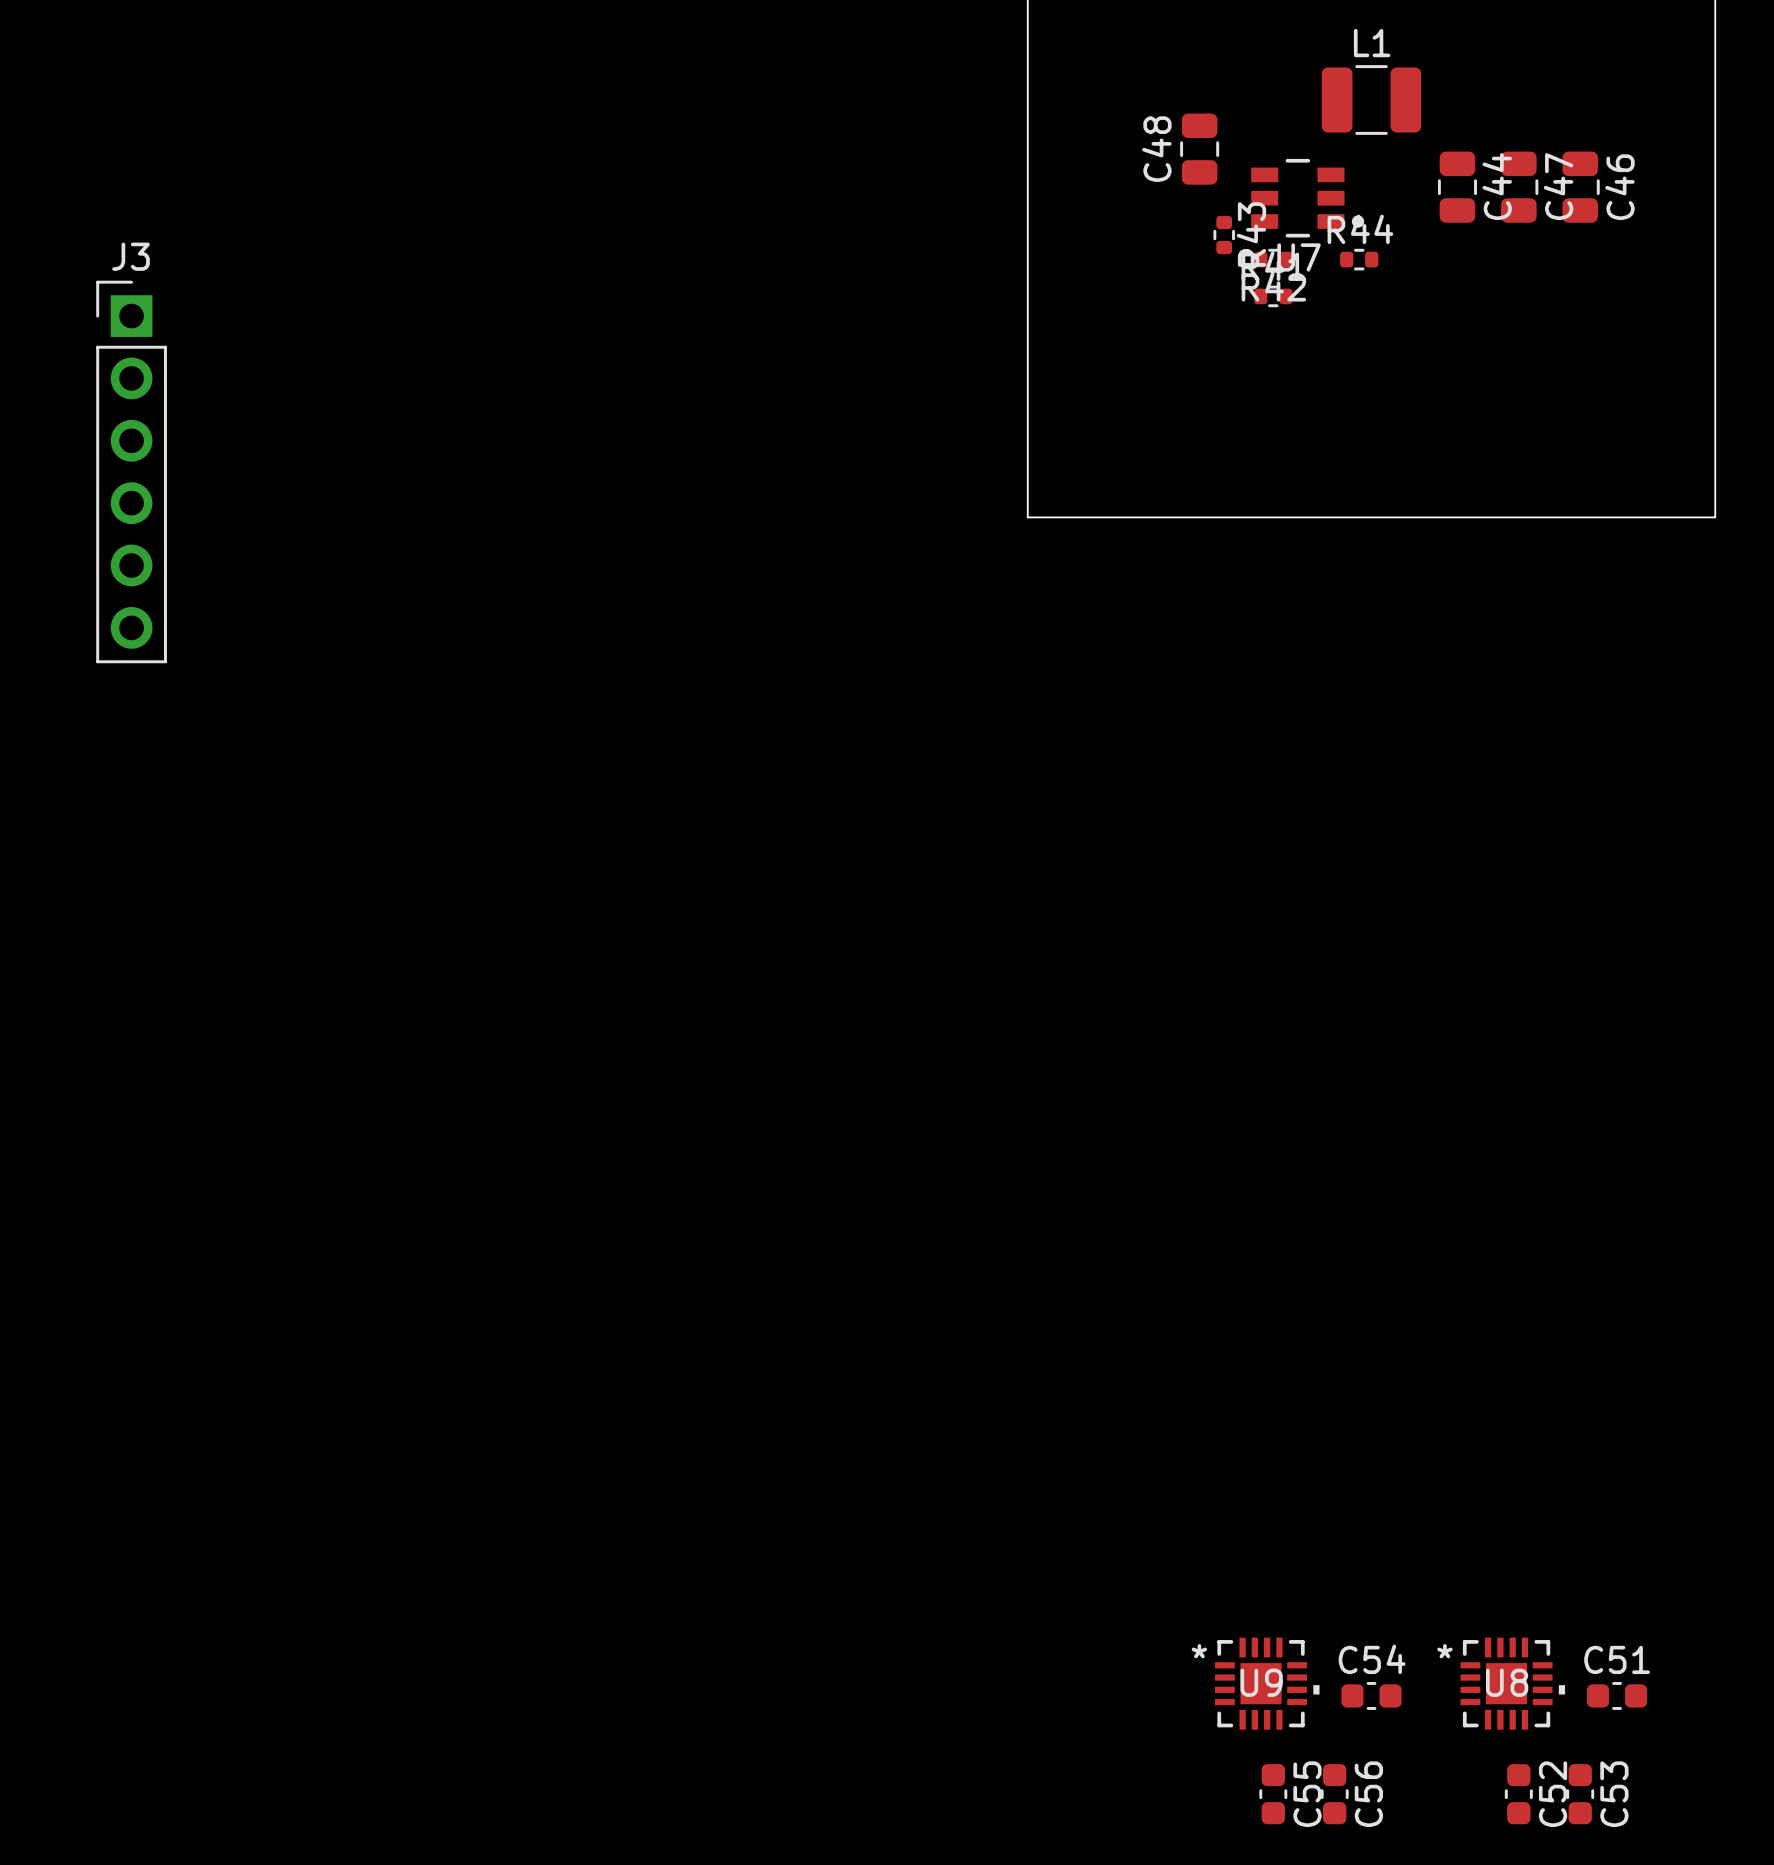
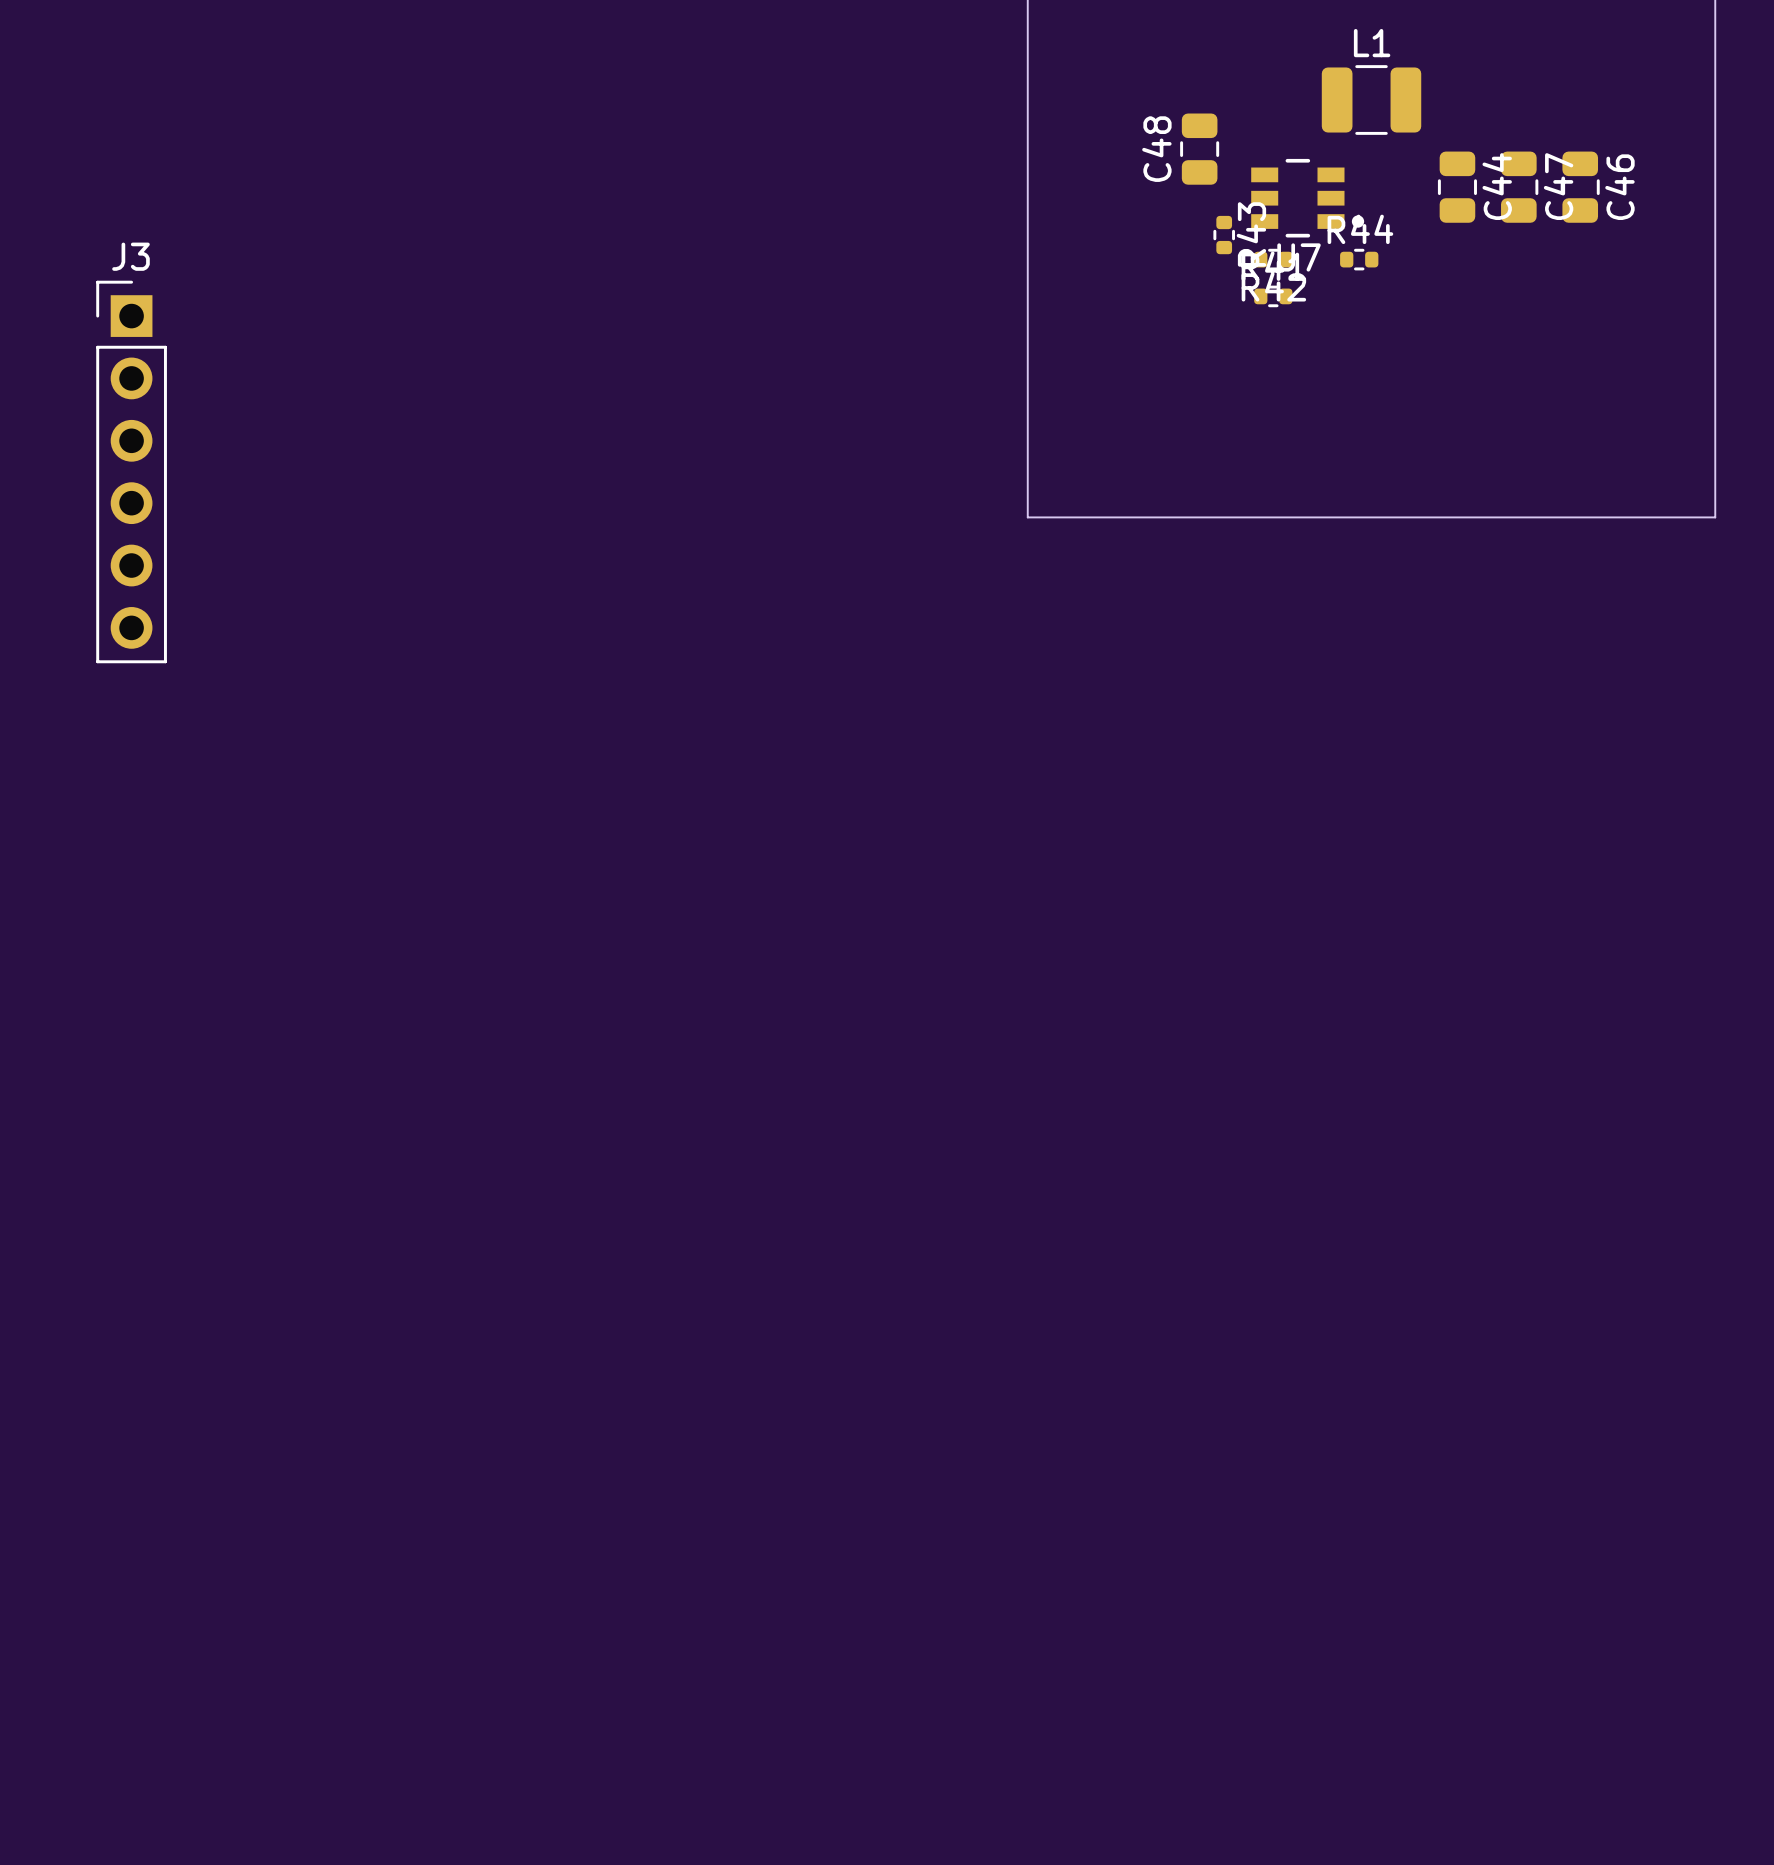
U9: (1267, 1683) -> none
U8: (1512, 1683) -> none
C54: (1371, 1695) -> none
C51: (1617, 1695) -> none
C55: (1273, 1794) -> none
C56: (1334, 1794) -> none
C52: (1518, 1794) -> none
C53: (1580, 1794) -> none

